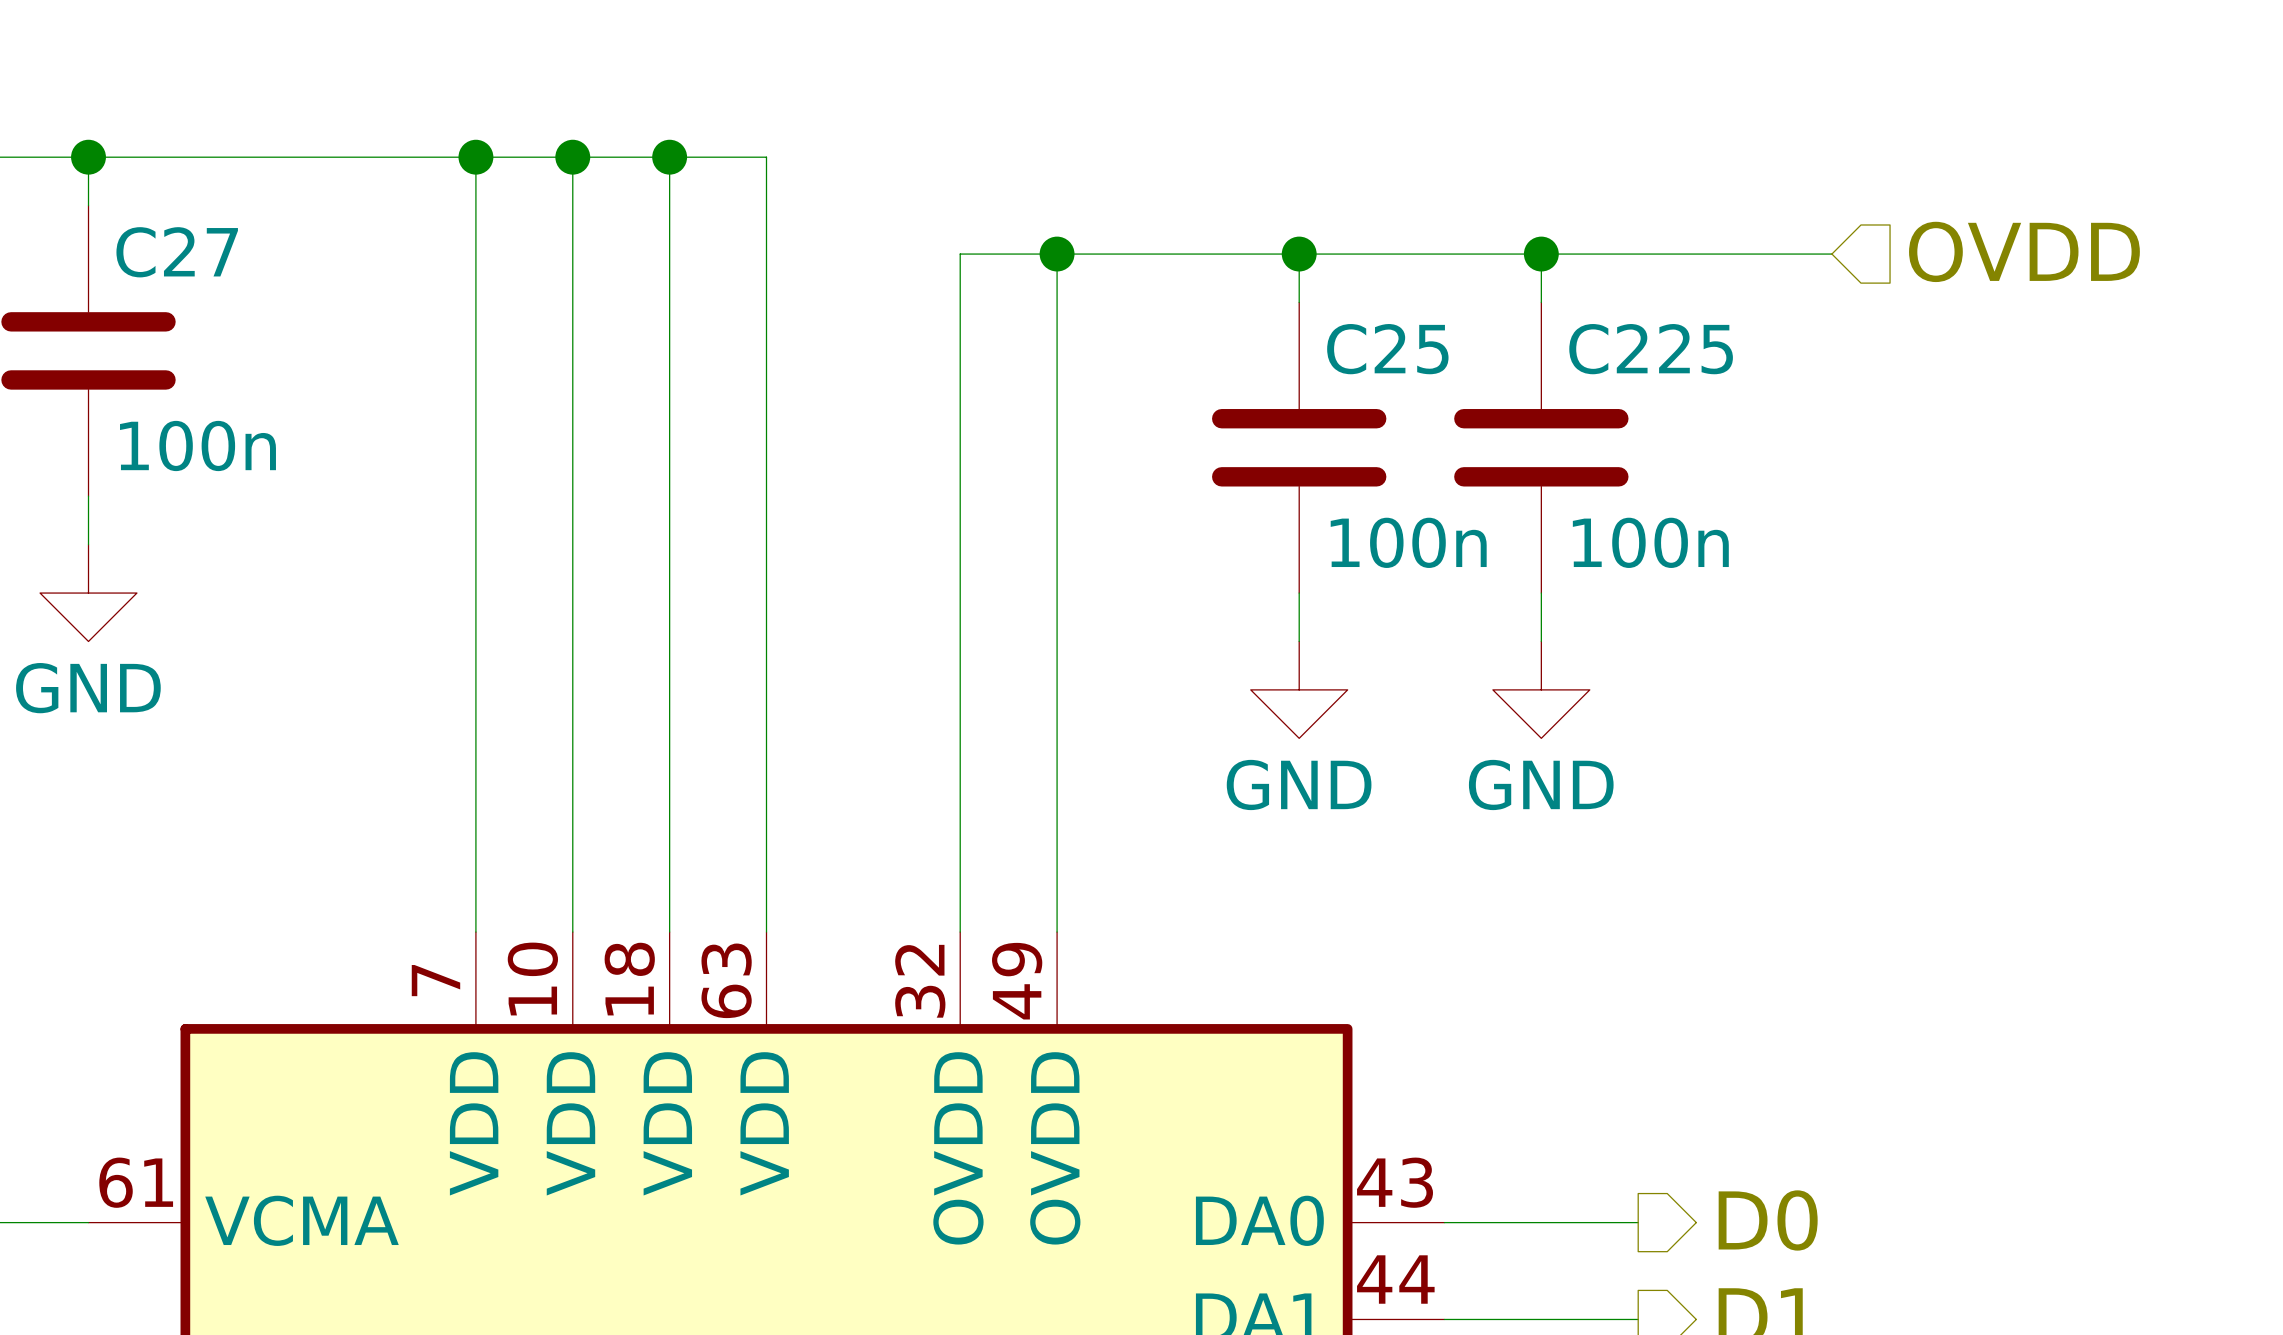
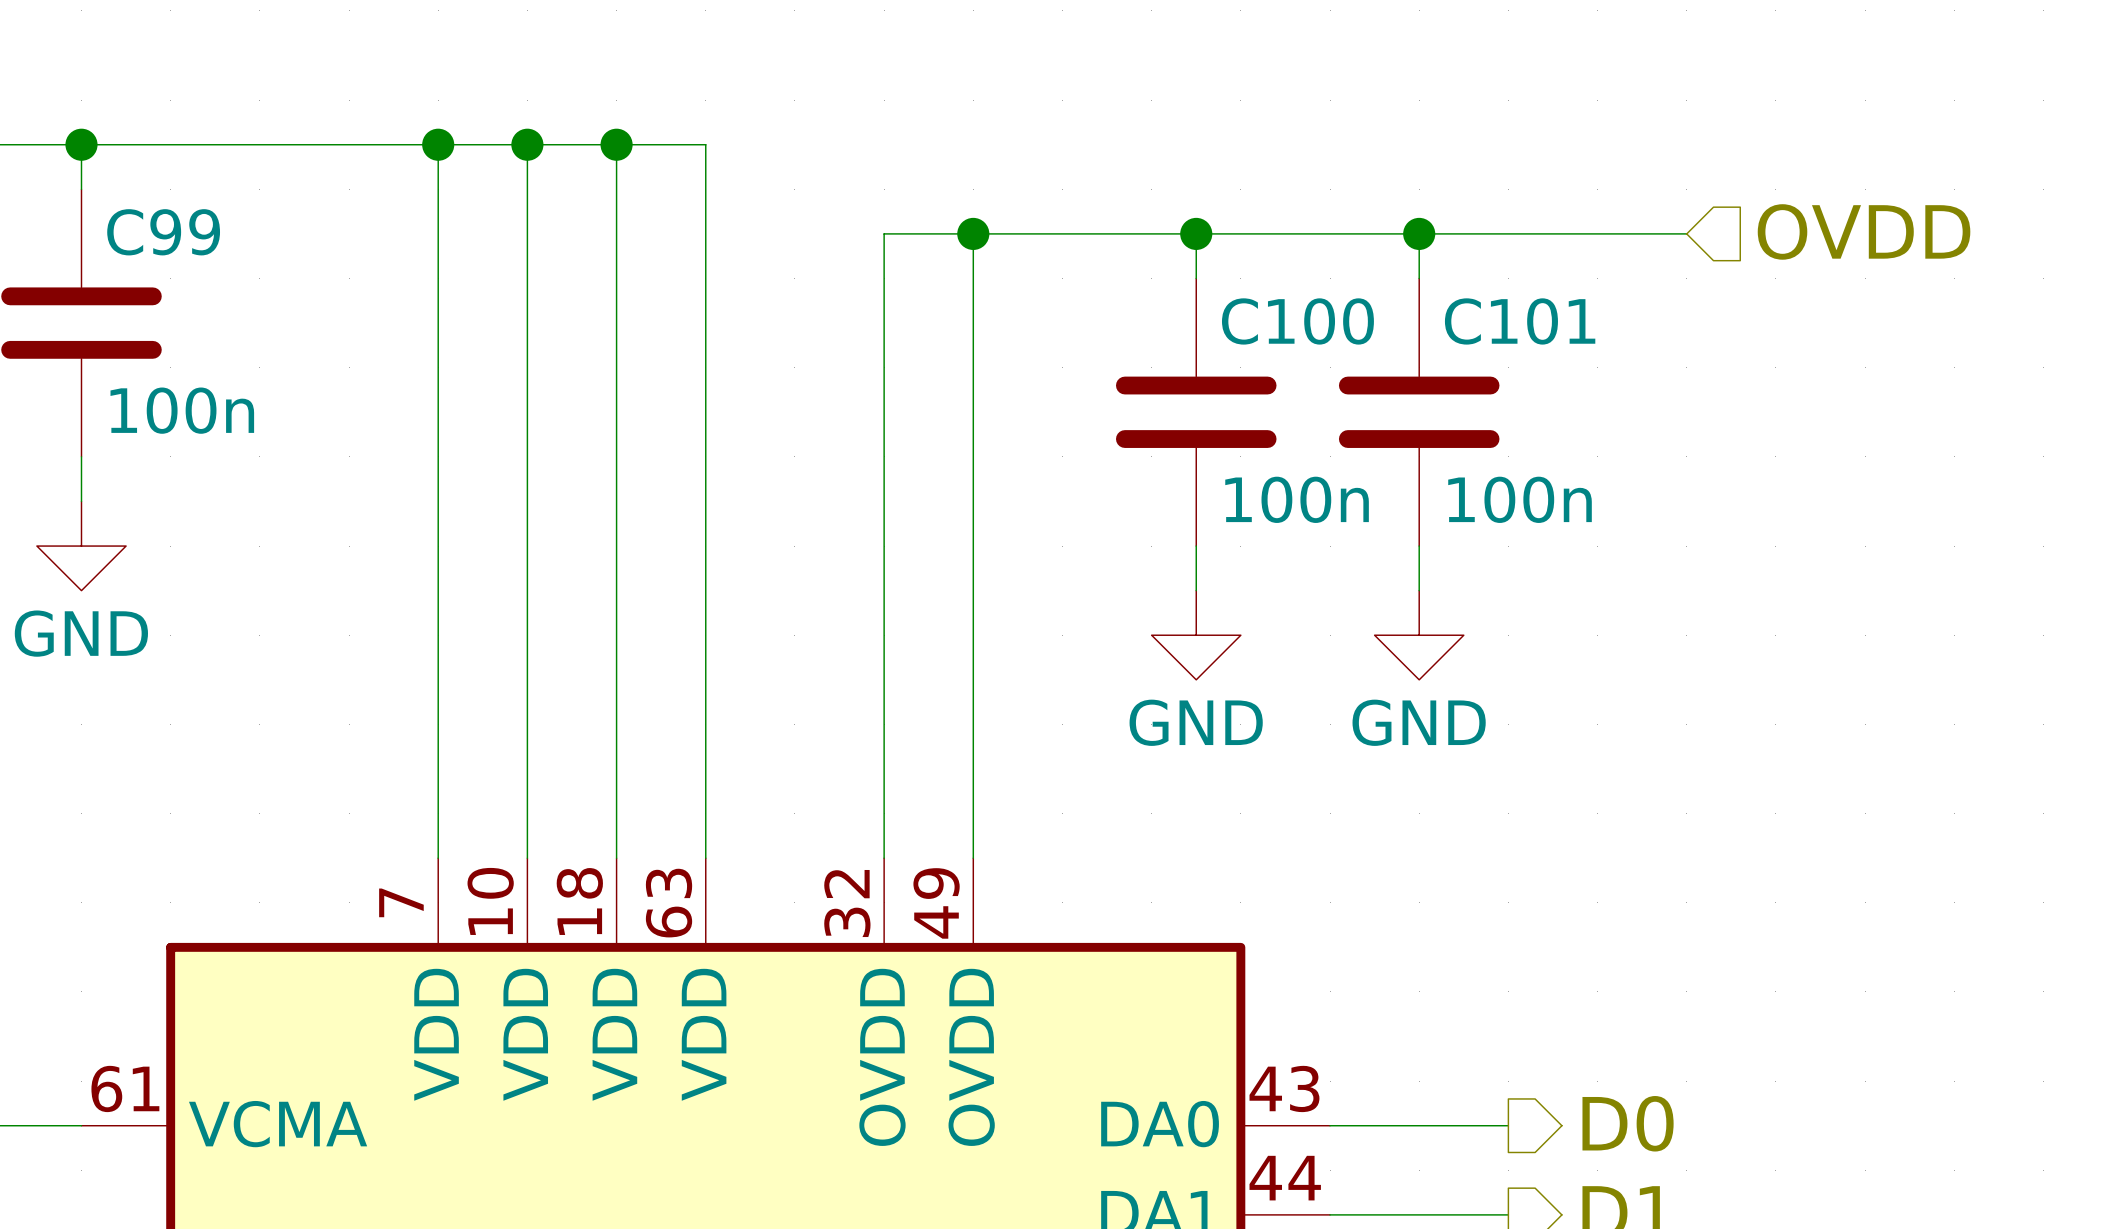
C27 name: C27 (177, 252) -> C99 (163, 232)
C25 name: C25 (1387, 349) -> C100 (1297, 321)
C225 name: C225 (1651, 349) -> C101 (1520, 321)

